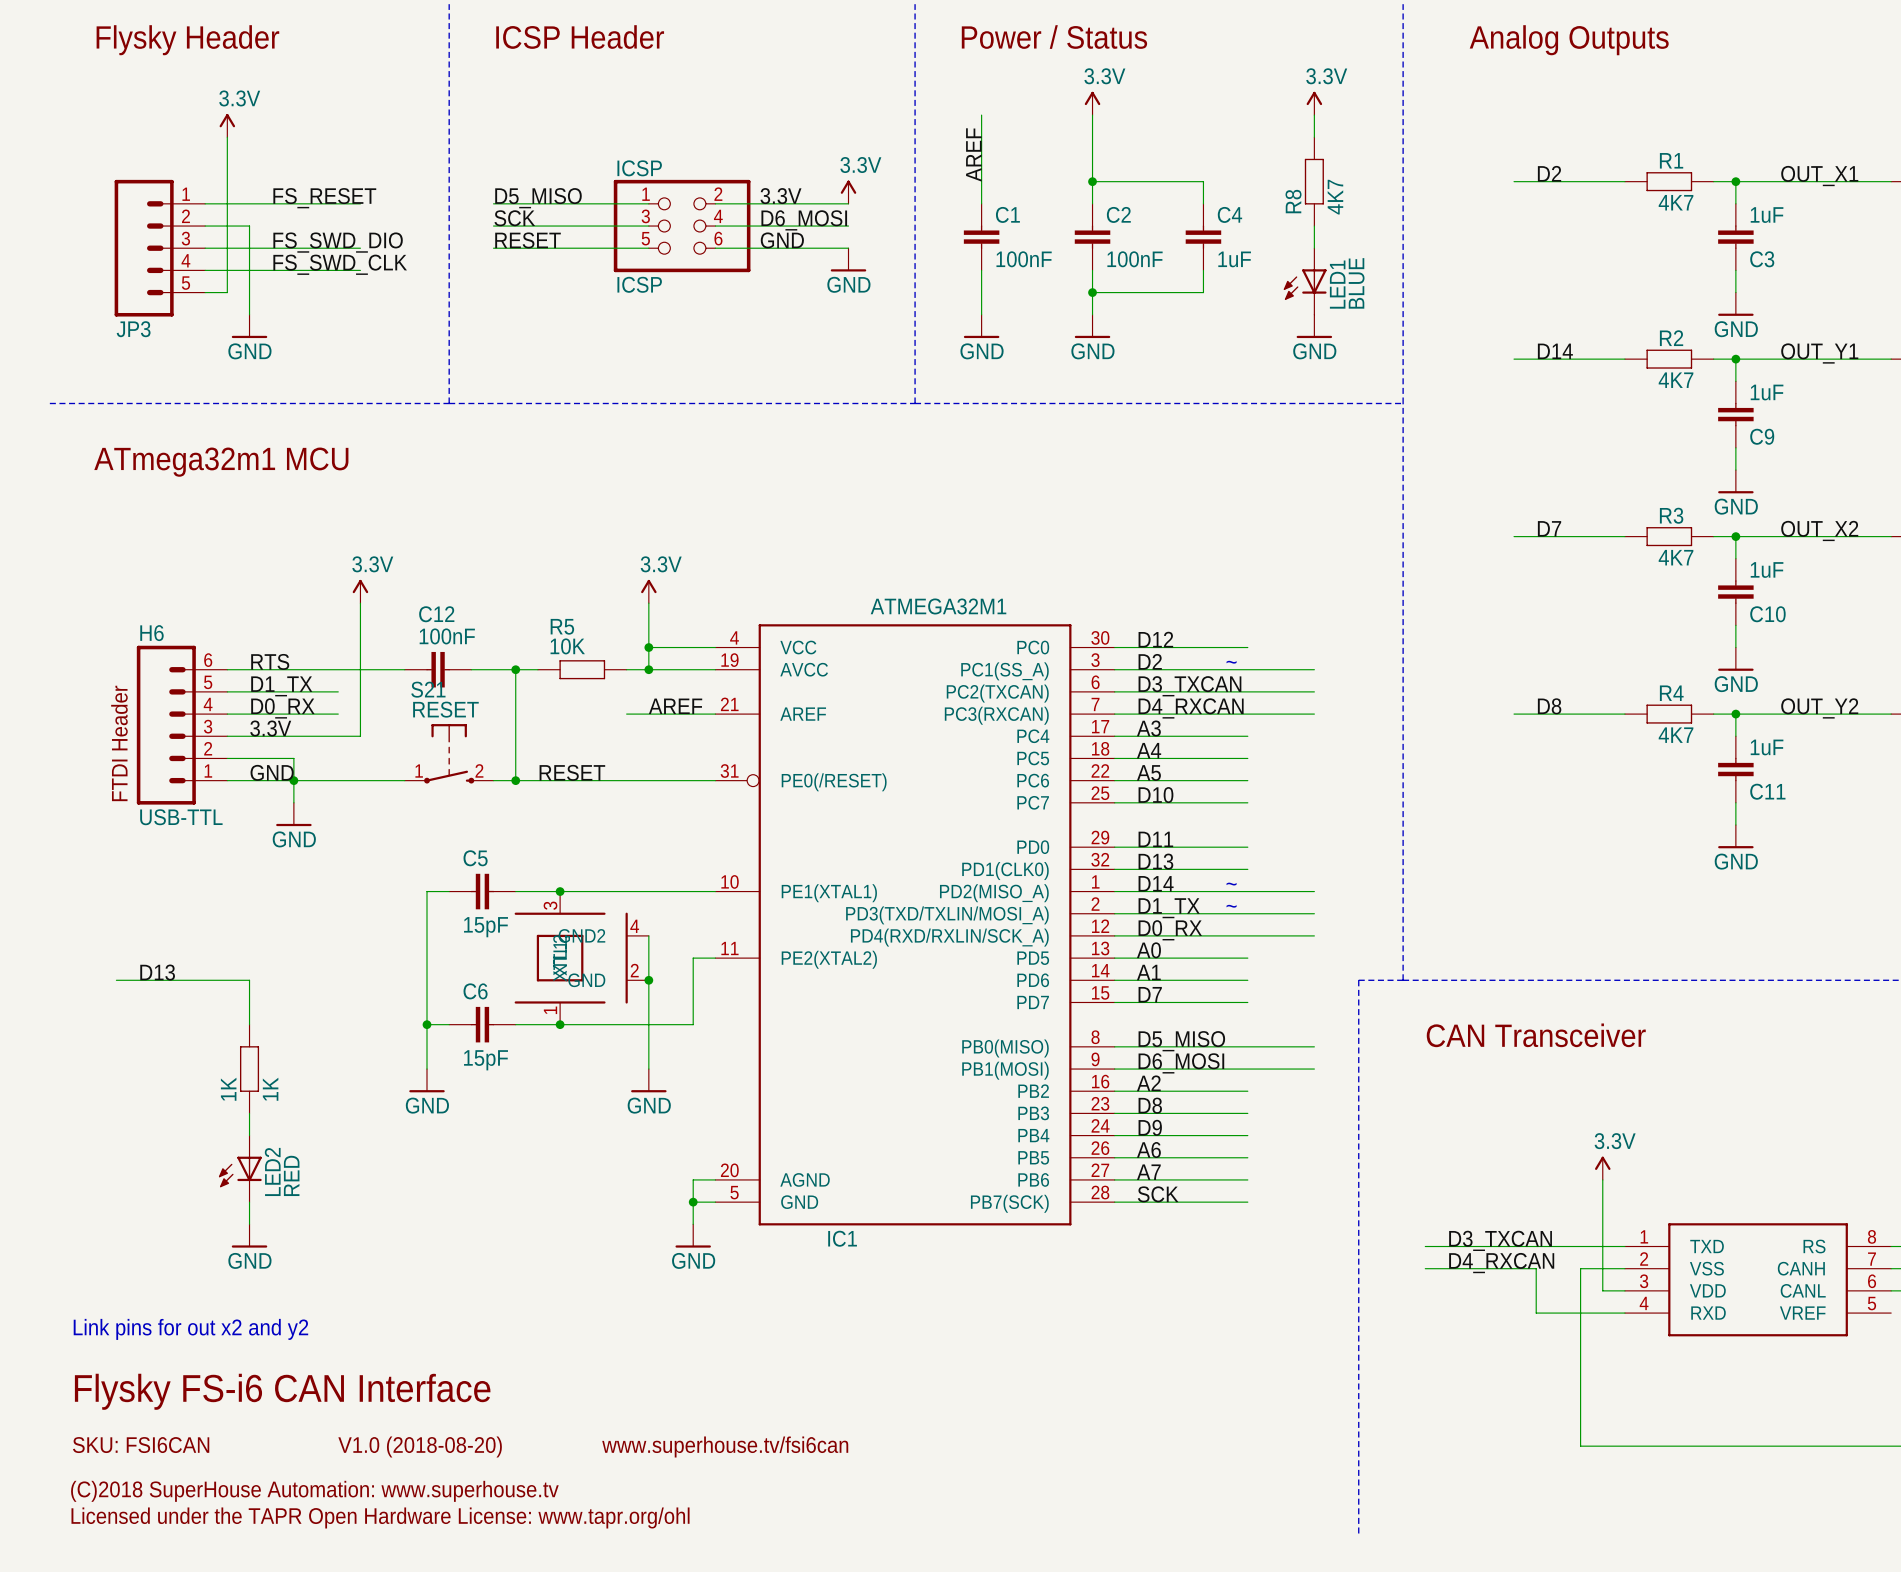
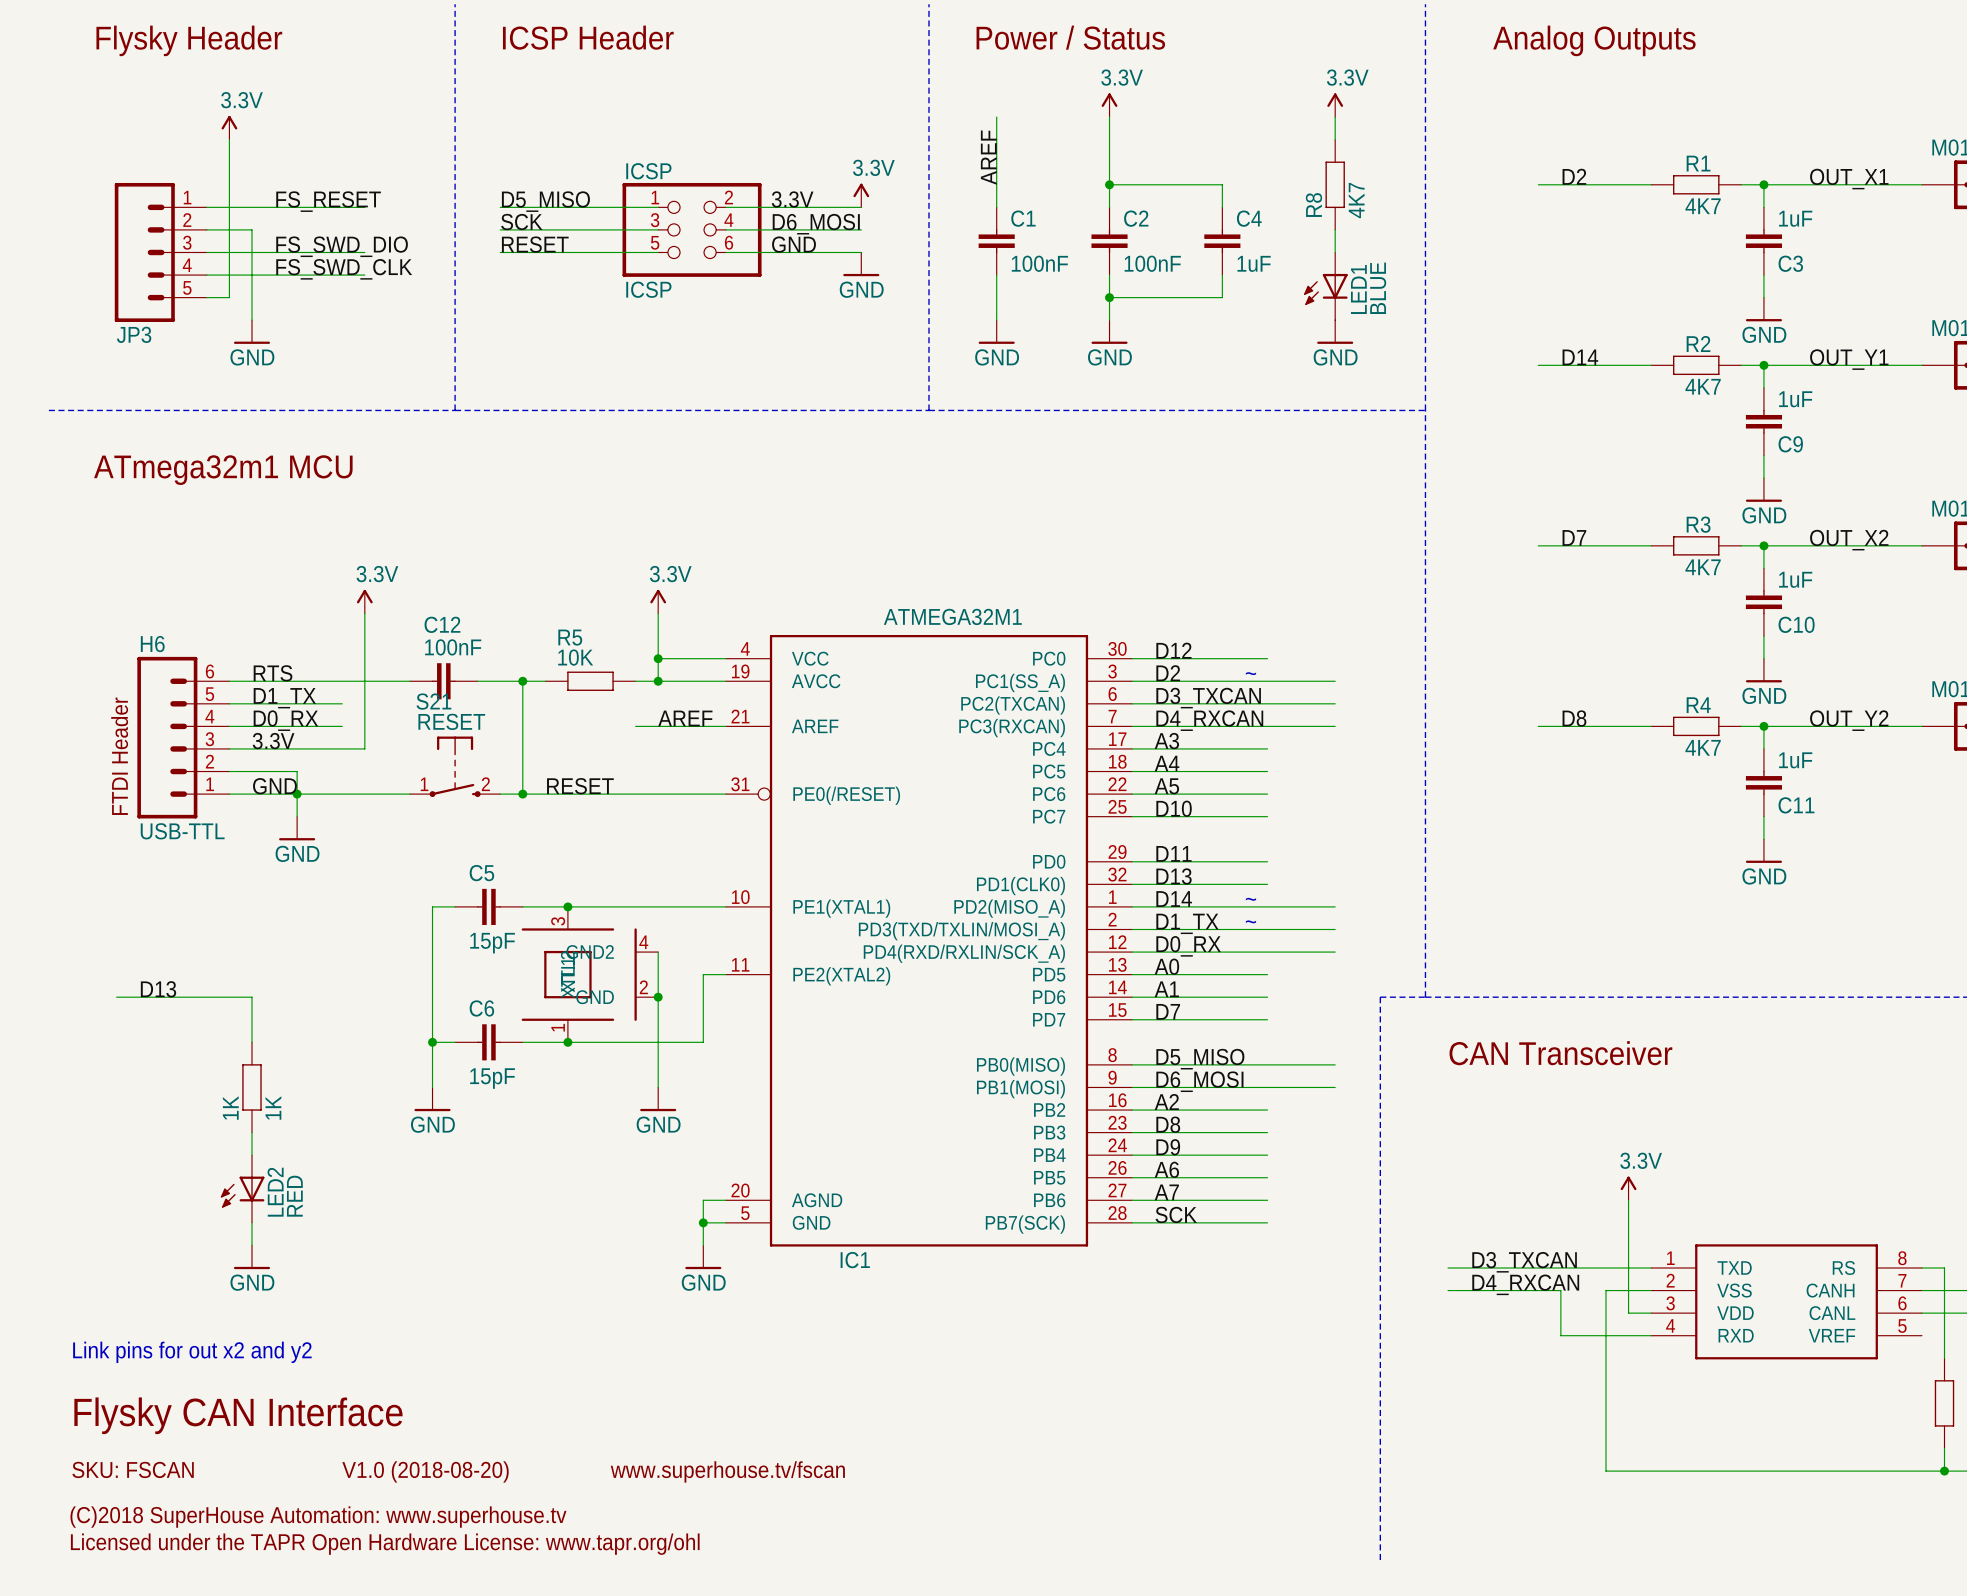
text: Flysky FS-i6 CAN Interface (282, 1391) -> Flysky CAN Interface (238, 1415)
text: SKU: FSI6CAN (141, 1445) -> SKU: FSCAN (133, 1469)
text: www.superhouse.tv/fsi6can (725, 1446) -> www.superhouse.tv/fscan (727, 1471)

